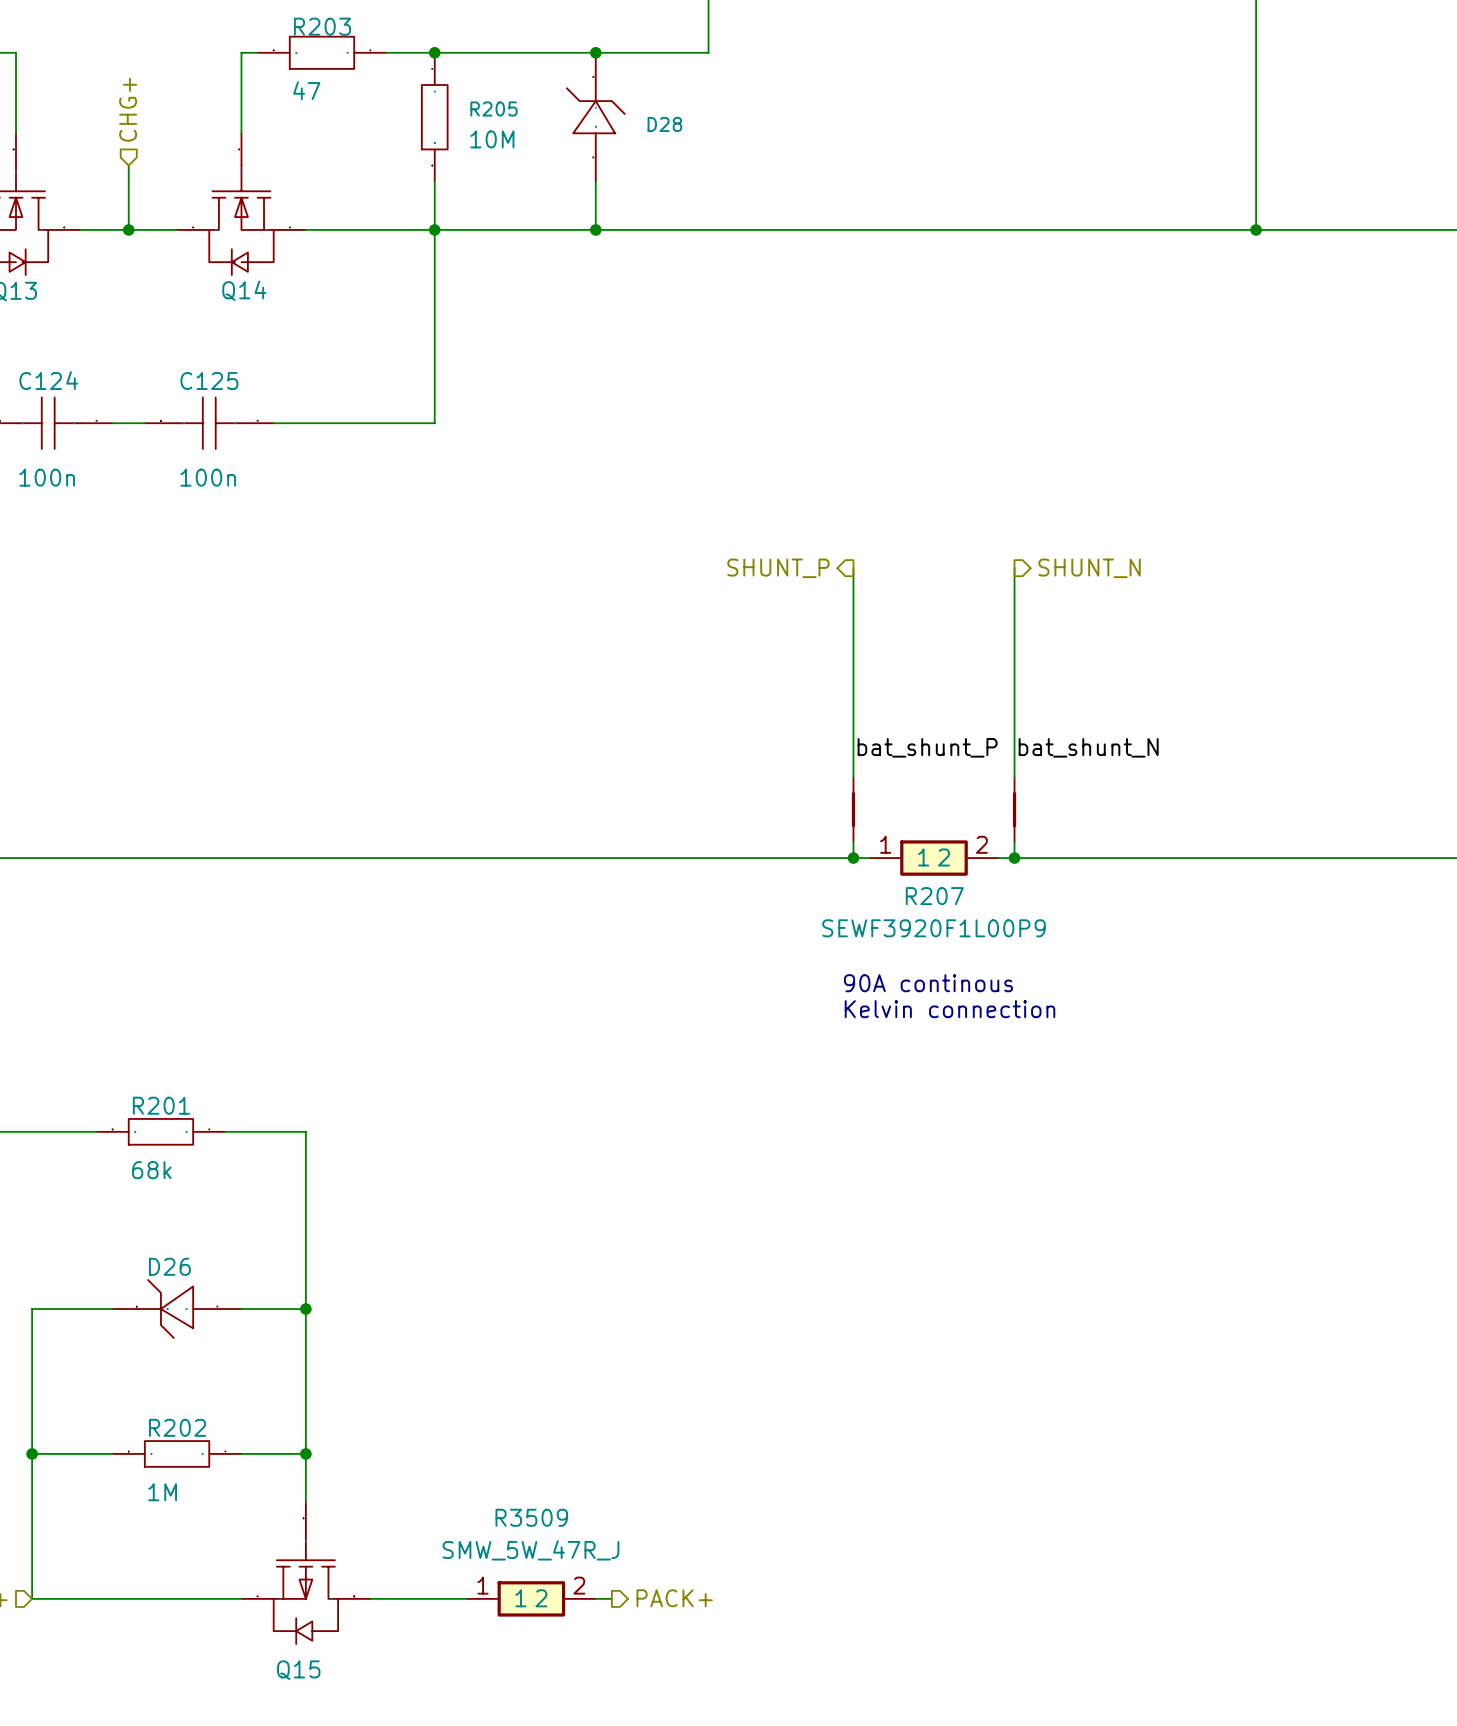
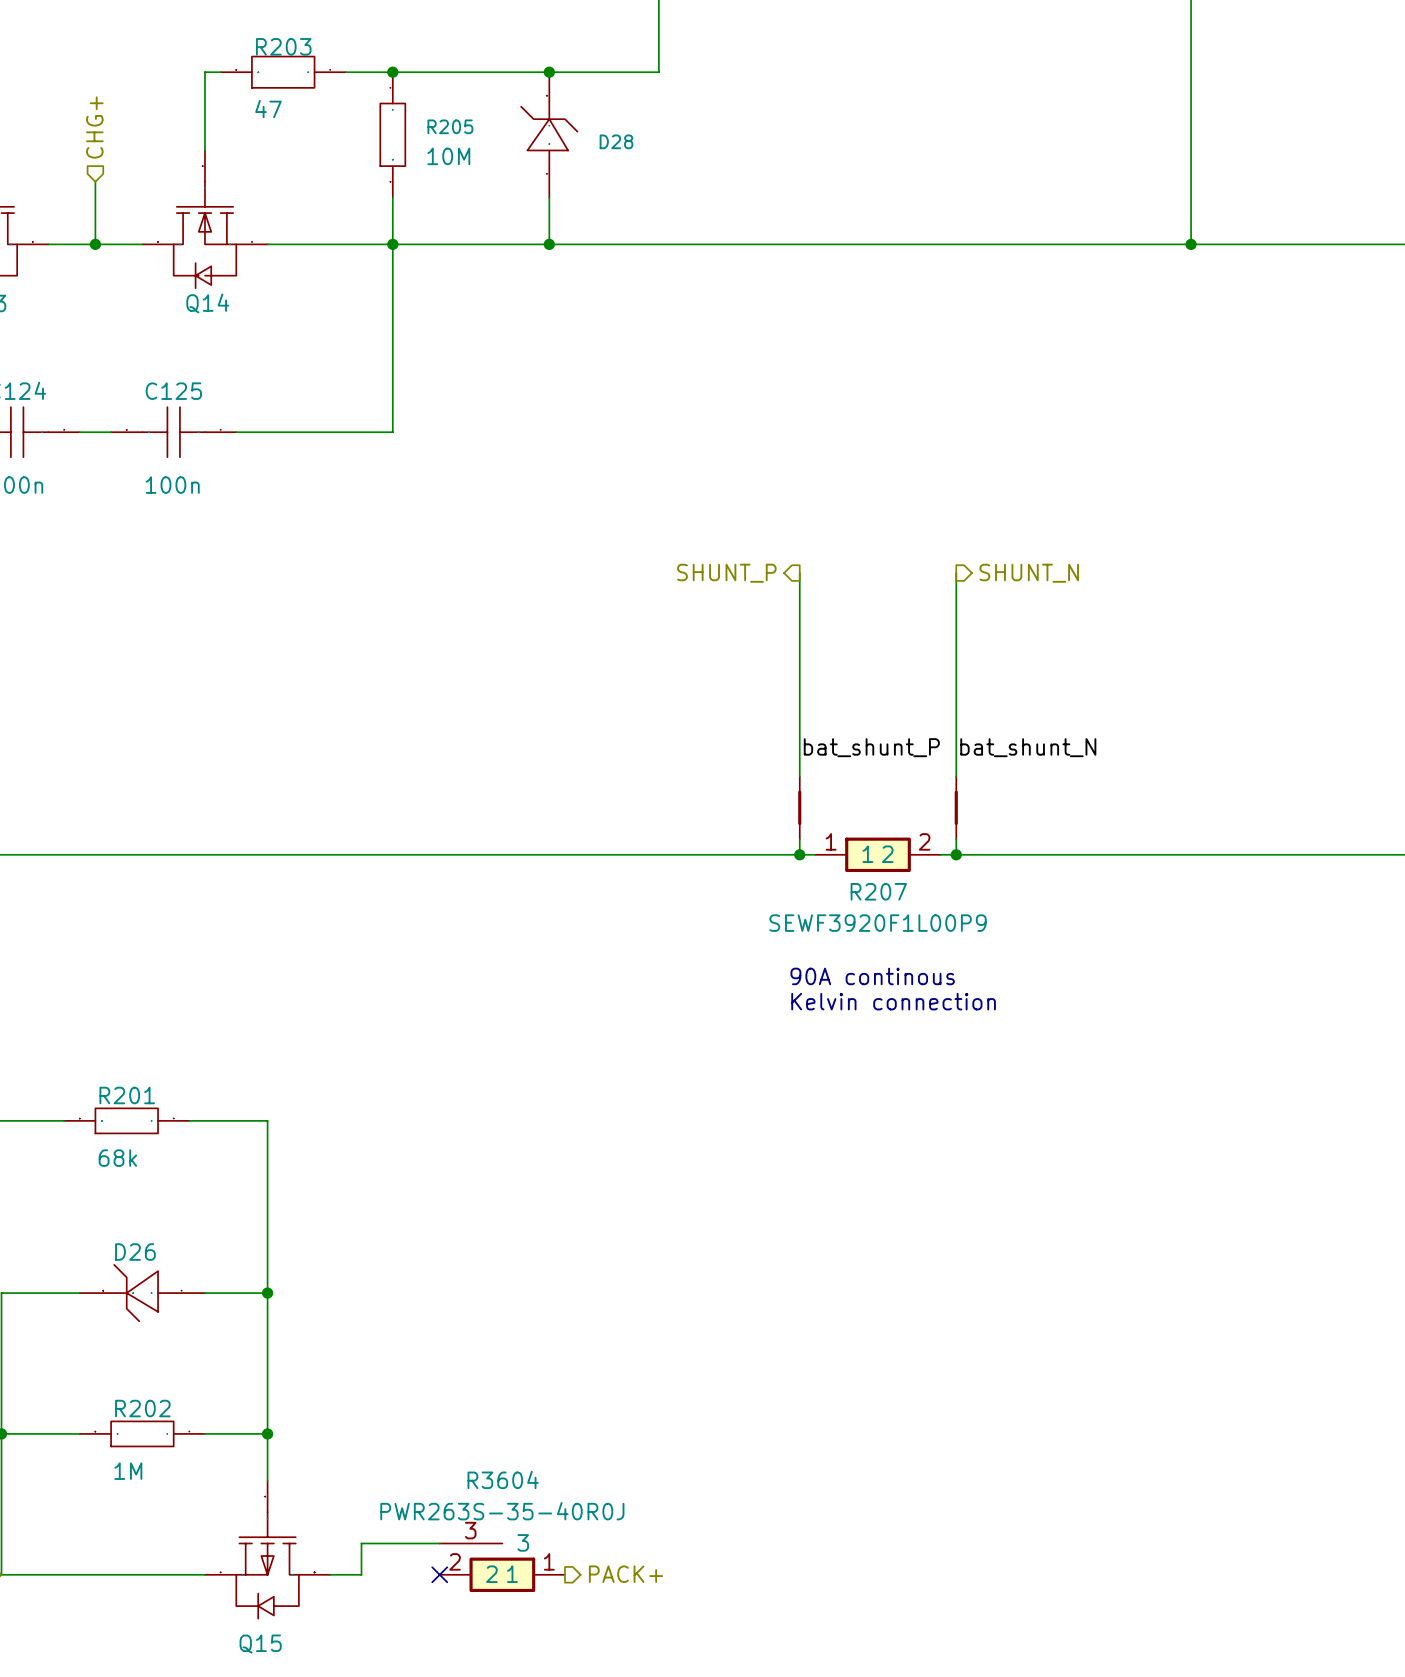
R3604: none -> PWR263S-35-40R0J (502, 1567)
wire: (402, 1598) (466, 1598) -> (361, 1574) (361, 1543) (439, 1543)
no-connect mark: none -> (439, 1574)
R3509: SMW_5W_47R_J (531, 1598) -> none

